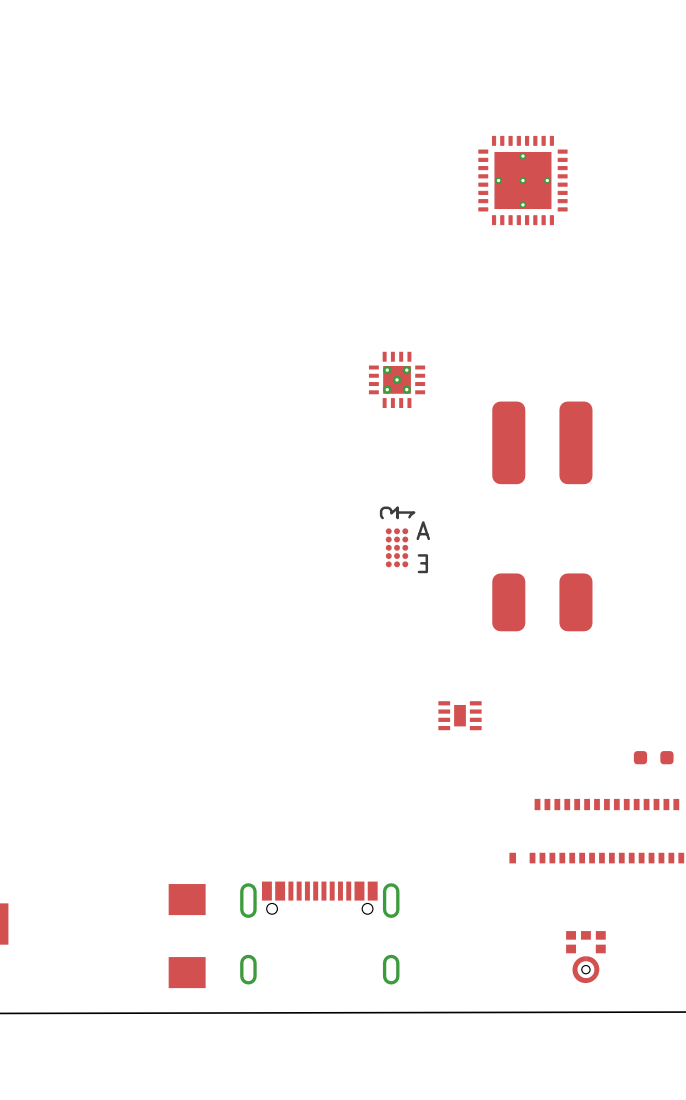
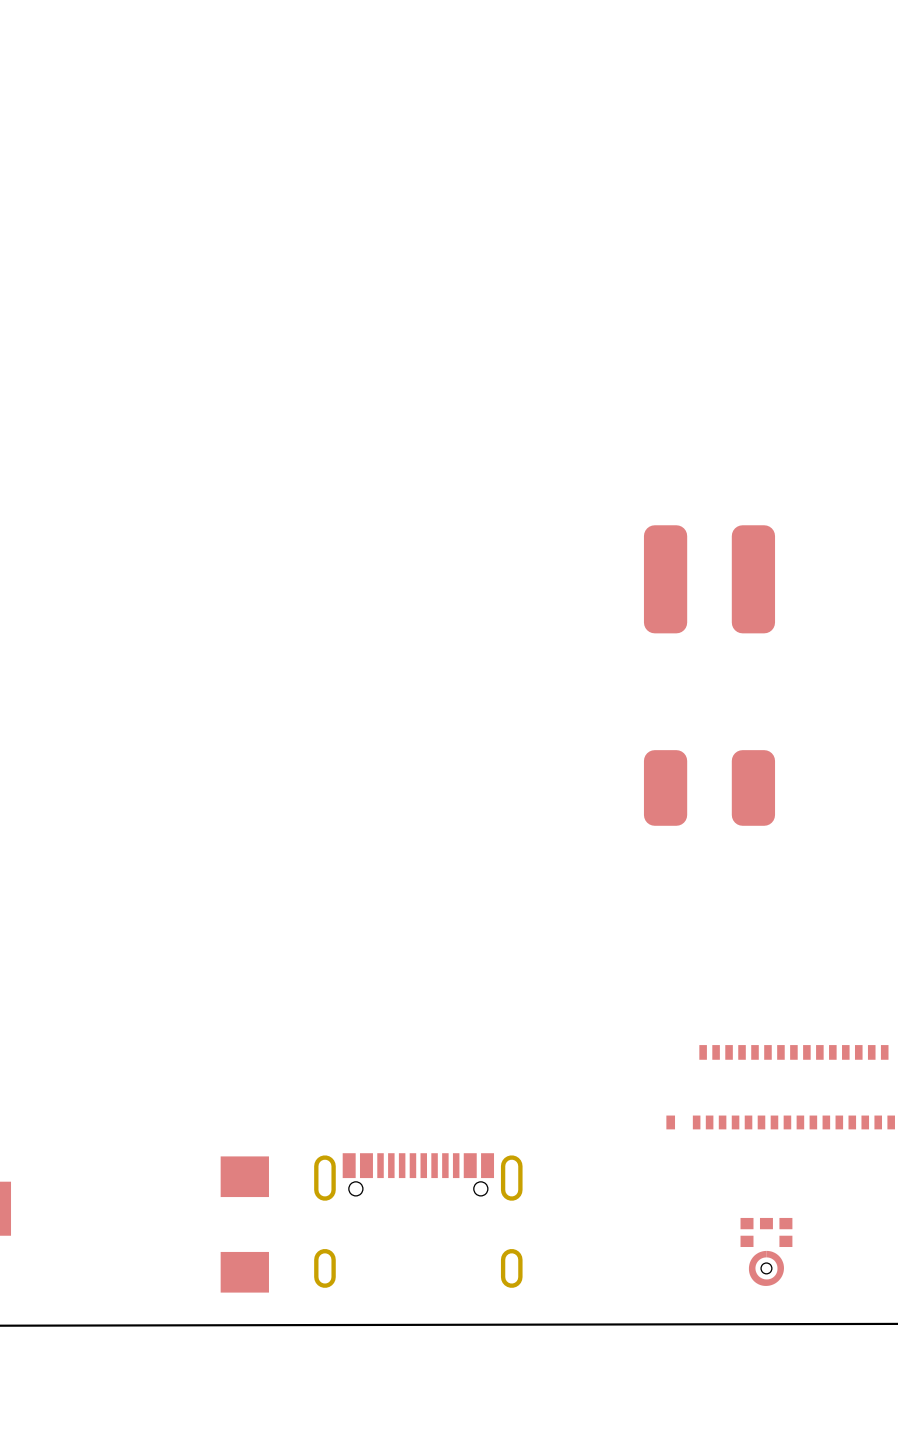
part: (522, 180) -> none
part: (397, 379) -> none
part: (397, 547) -> none
part: (459, 715) -> none
part: (653, 757) -> none

